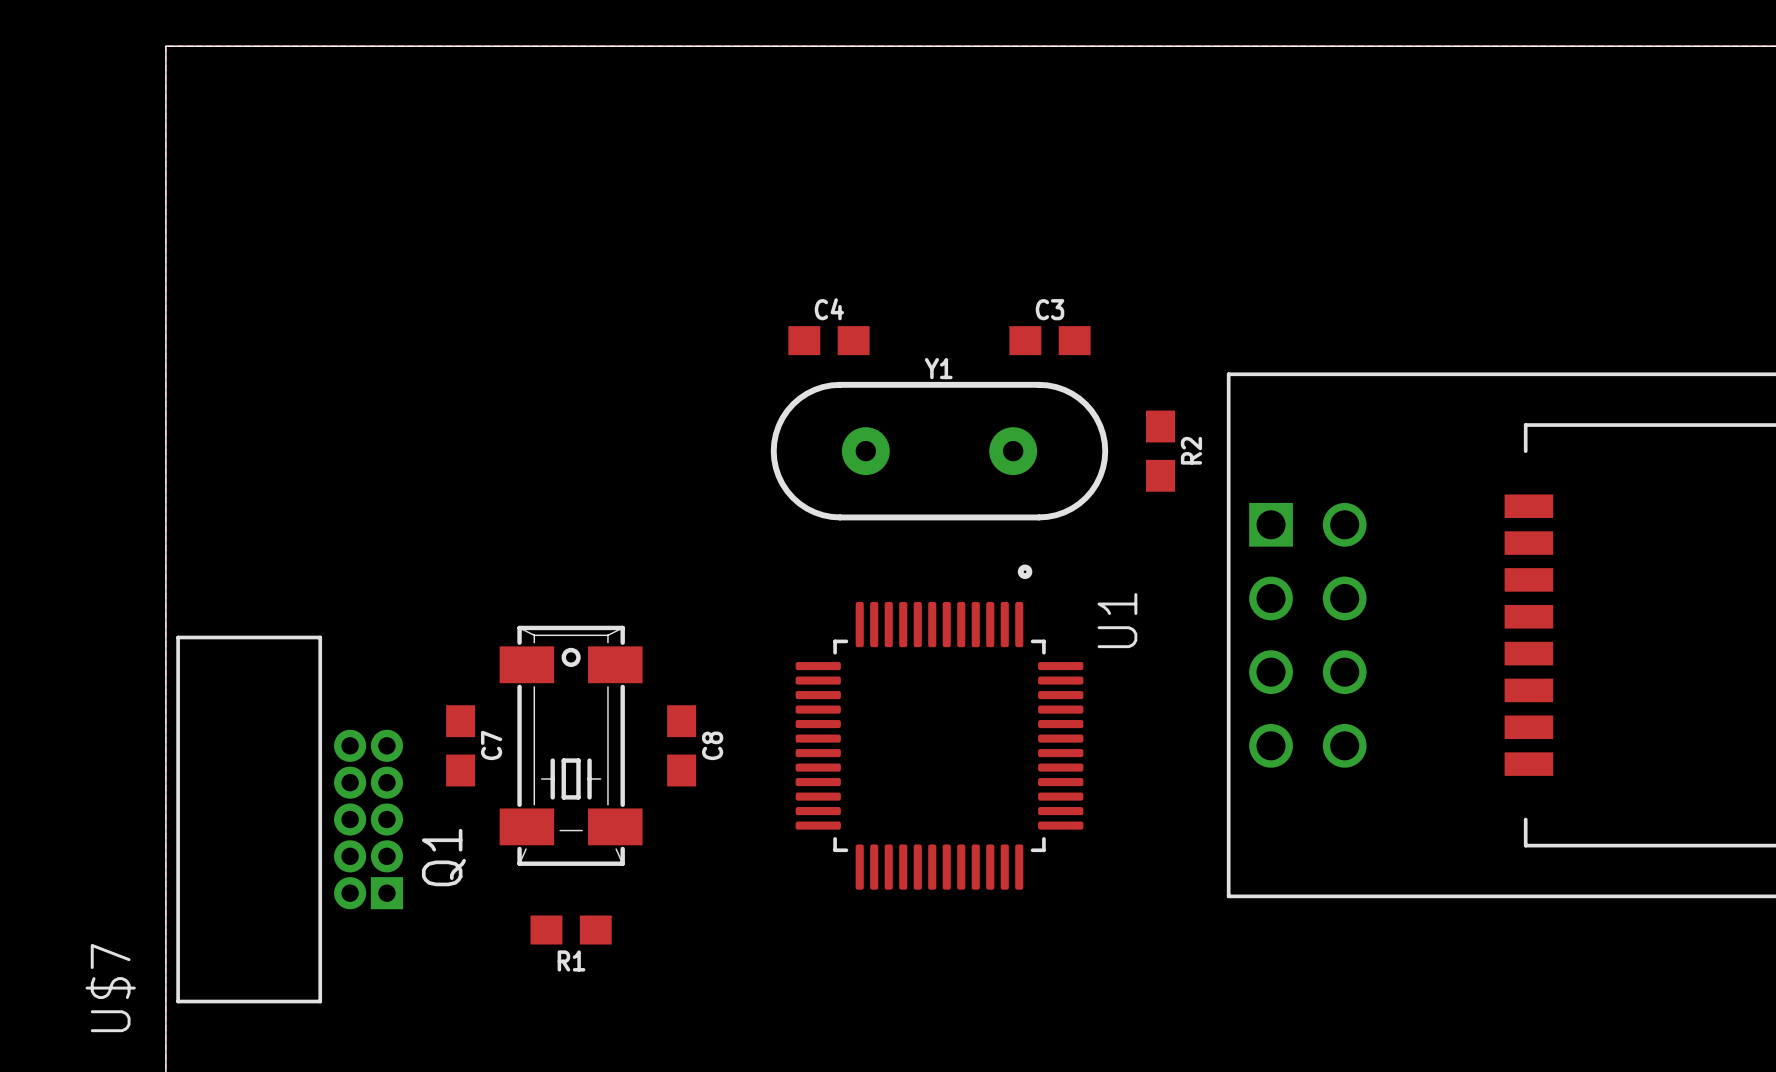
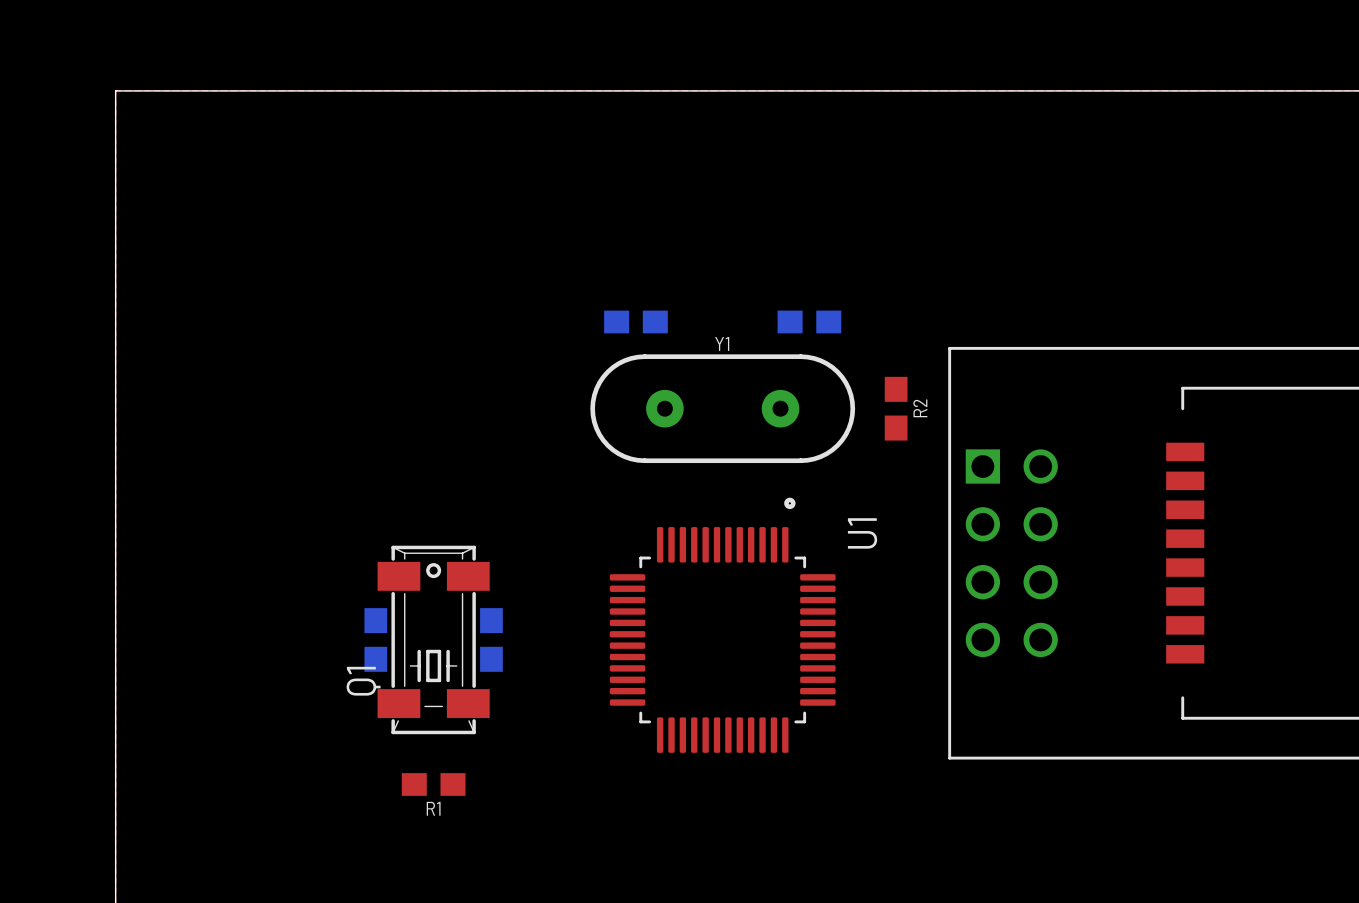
C4 side: top (828, 340) -> bottom (635, 321)
C3 side: top (1050, 340) -> bottom (809, 321)
C7 side: top (460, 745) -> bottom (375, 639)
C8 side: top (681, 745) -> bottom (491, 639)
U$7: (289, 819) -> none
Q1 name position: Q1 (443, 857) -> Q1 (363, 681)

